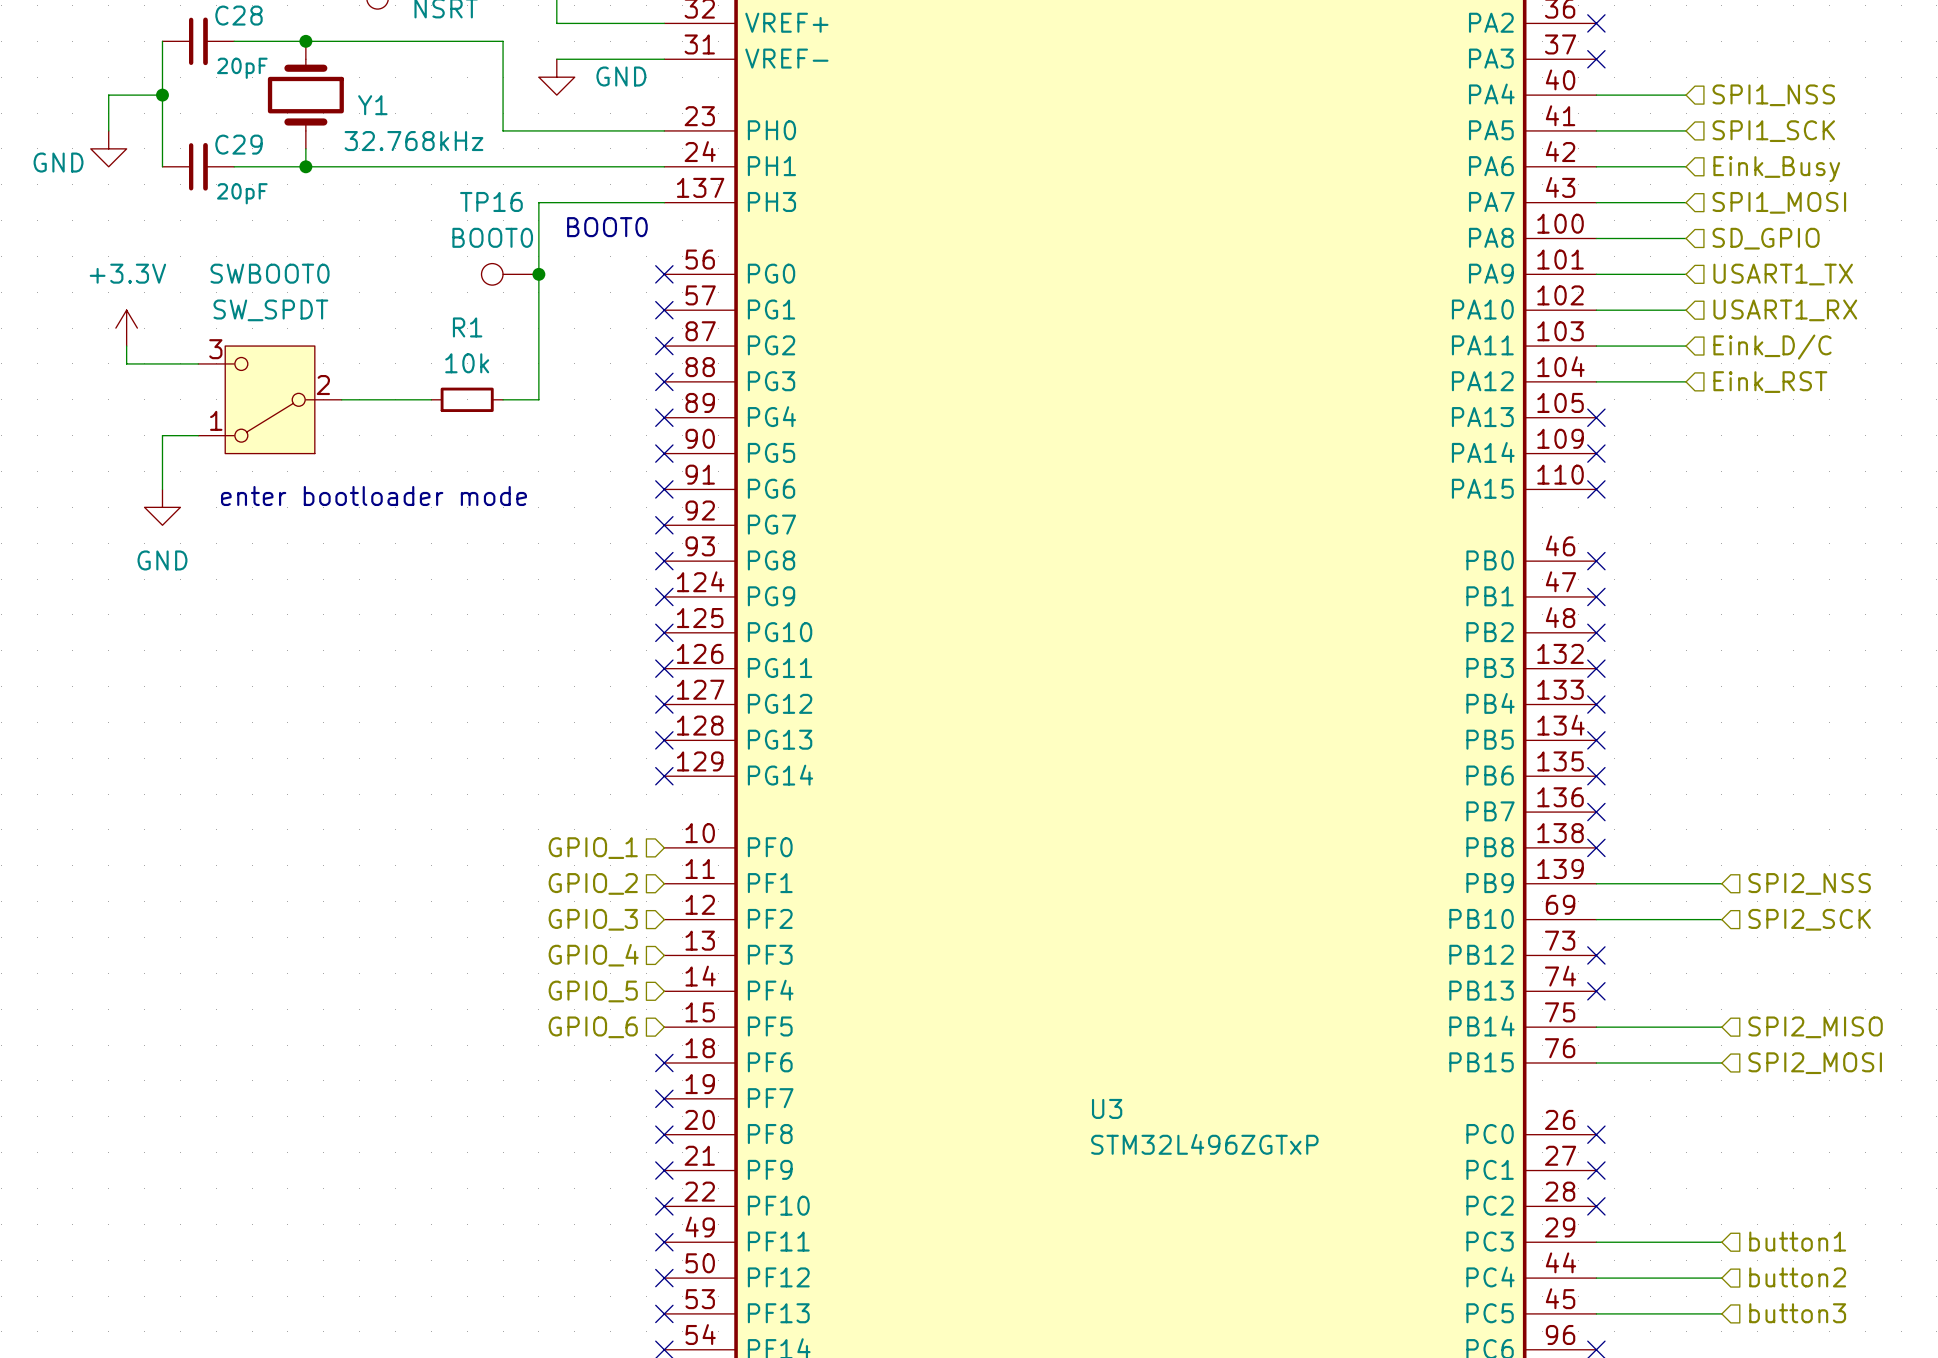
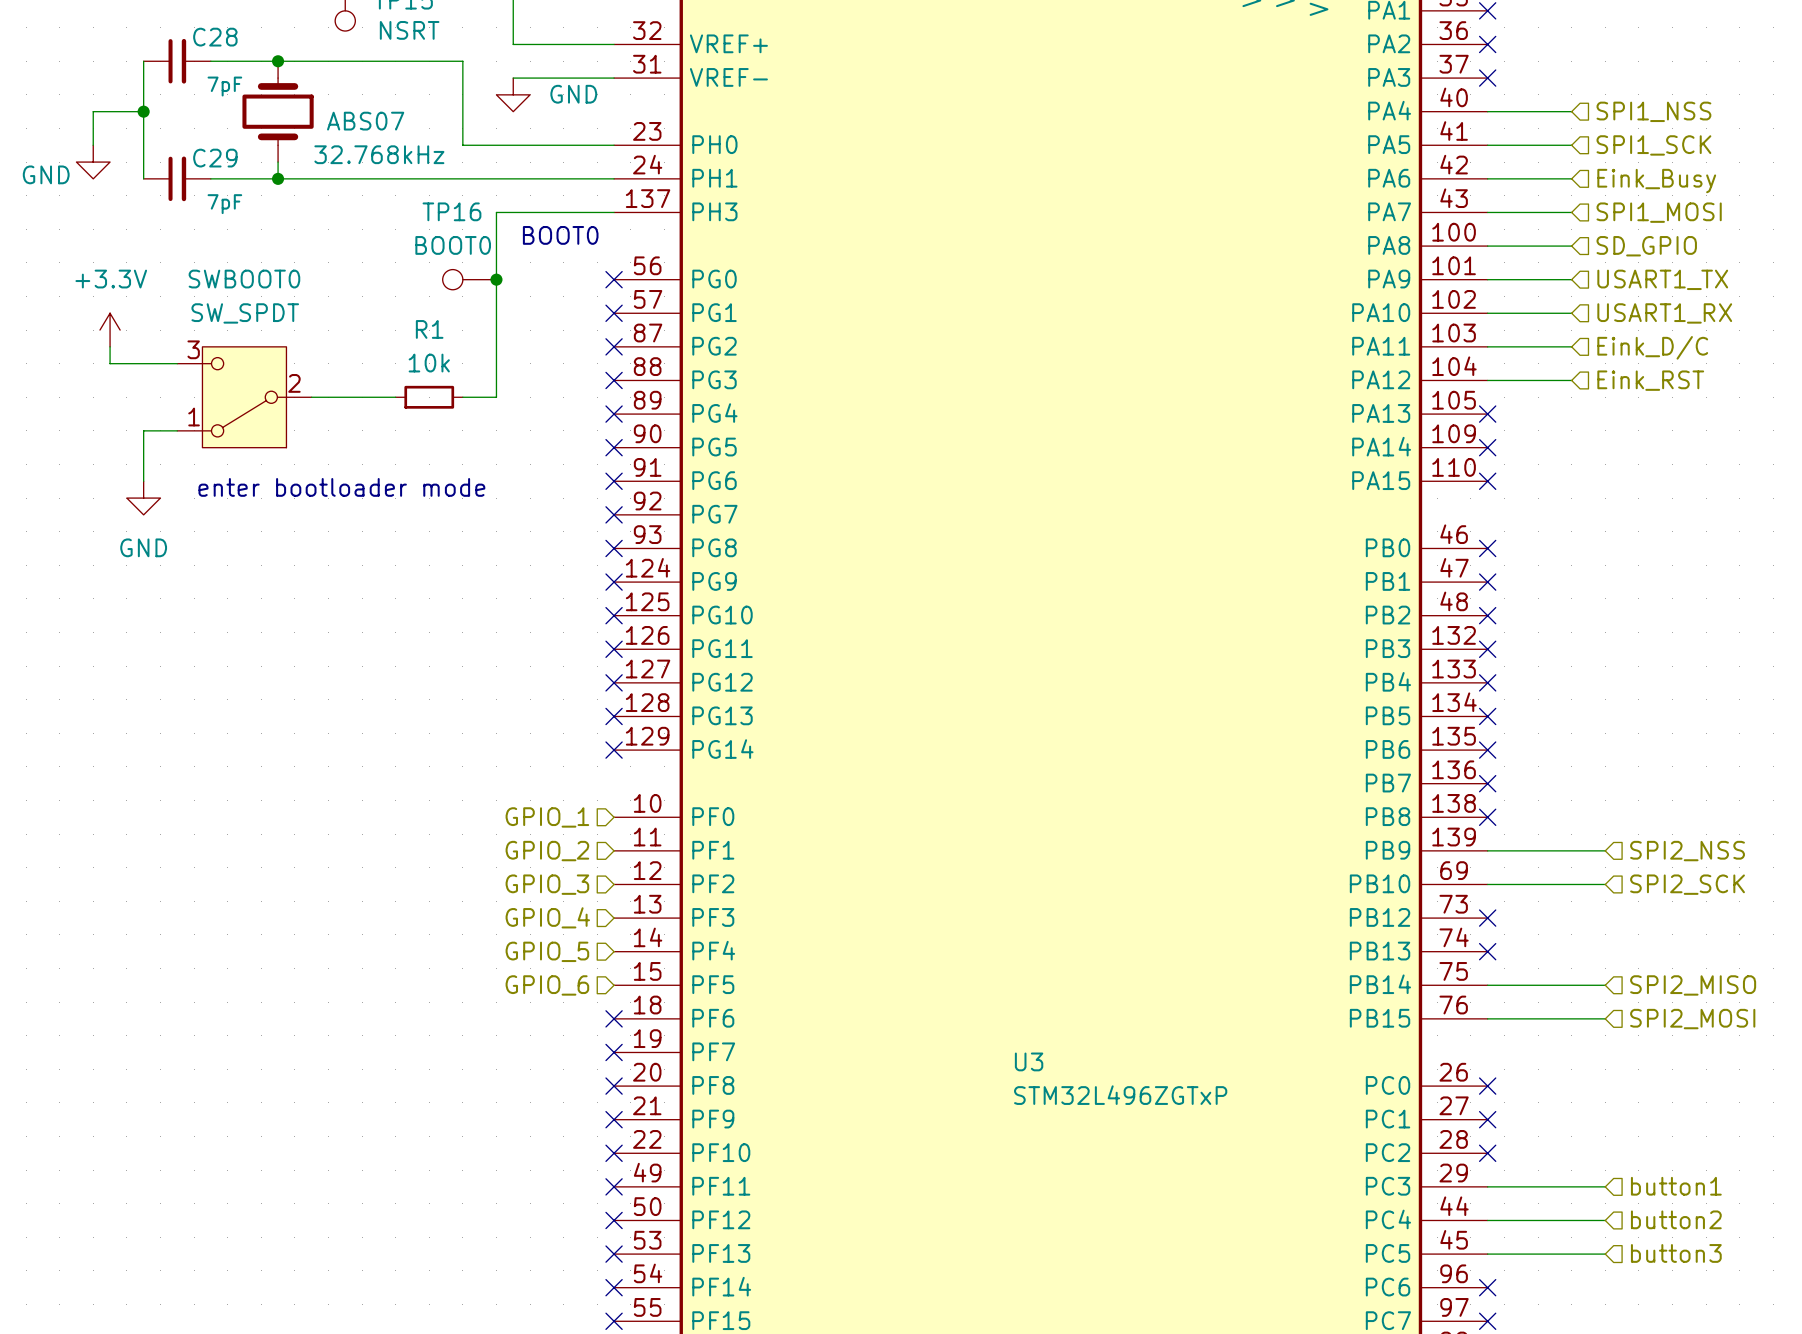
C28 value: 20pF (242, 68) -> 7pF (224, 86)
Y1 name: Y1 (372, 105) -> ABS07 (365, 121)
C29 value: 20pF (242, 193) -> 7pF (224, 204)

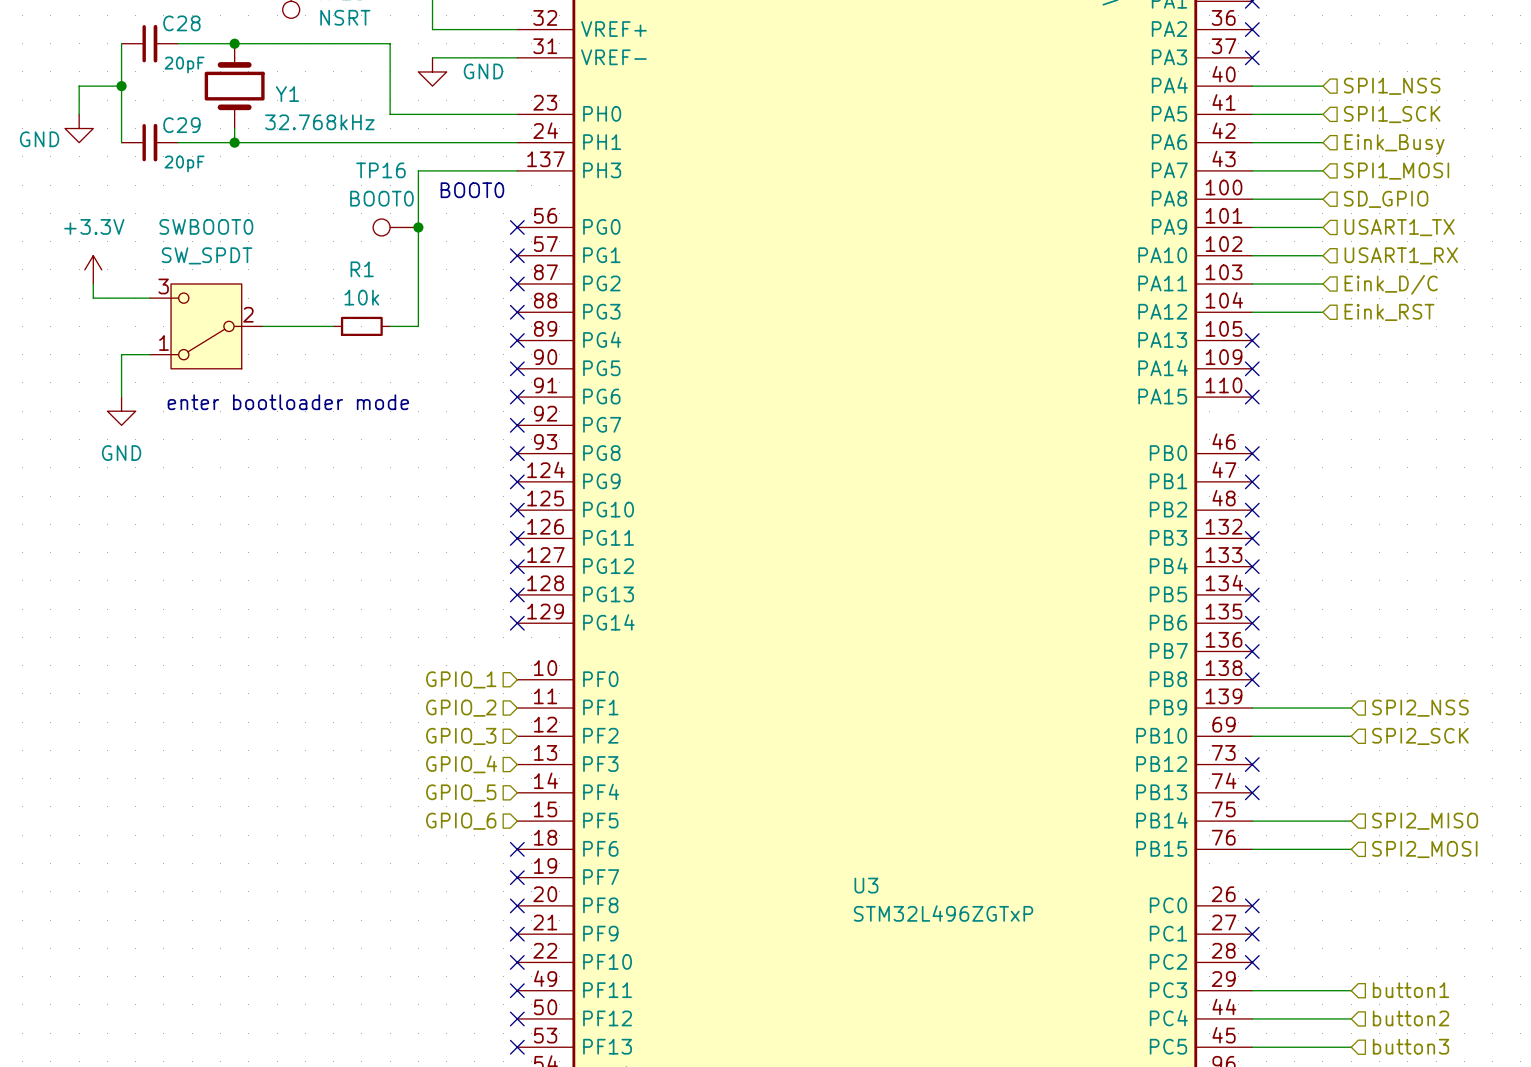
C28 value: 7pF (224, 86) -> 20pF (184, 64)
ABS07 name: ABS07 (365, 121) -> Y1 (287, 94)
C29 value: 7pF (224, 204) -> 20pF (184, 163)

